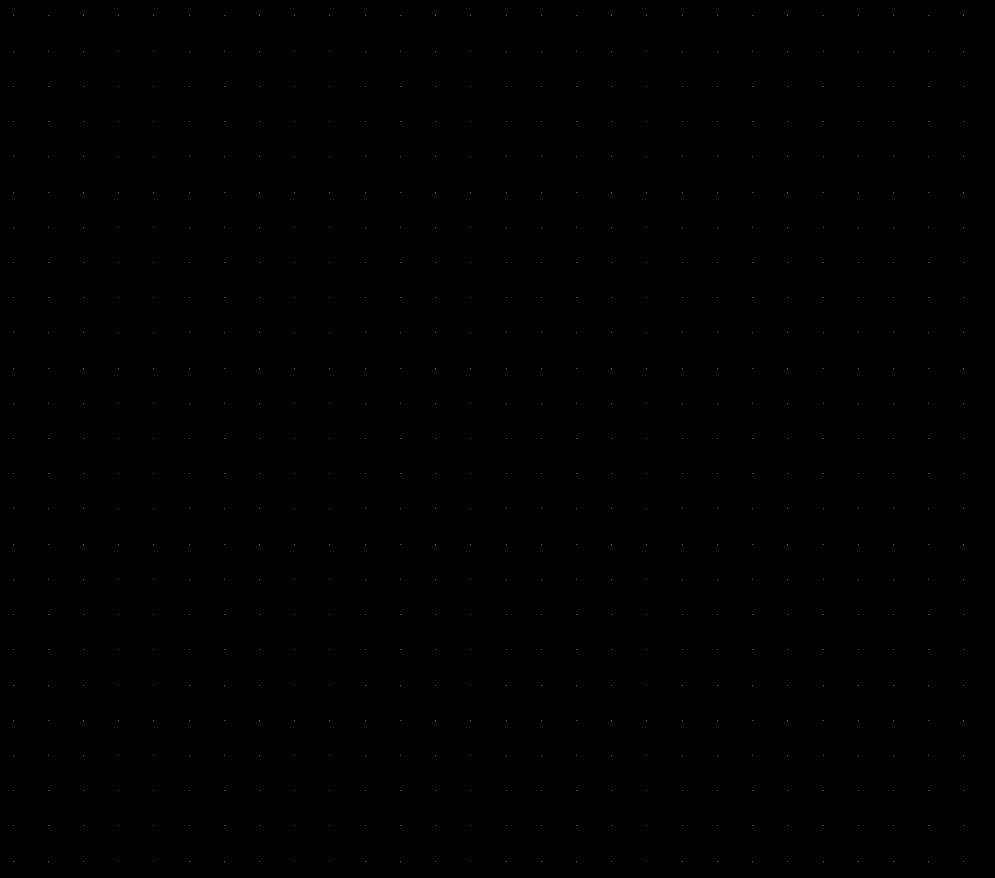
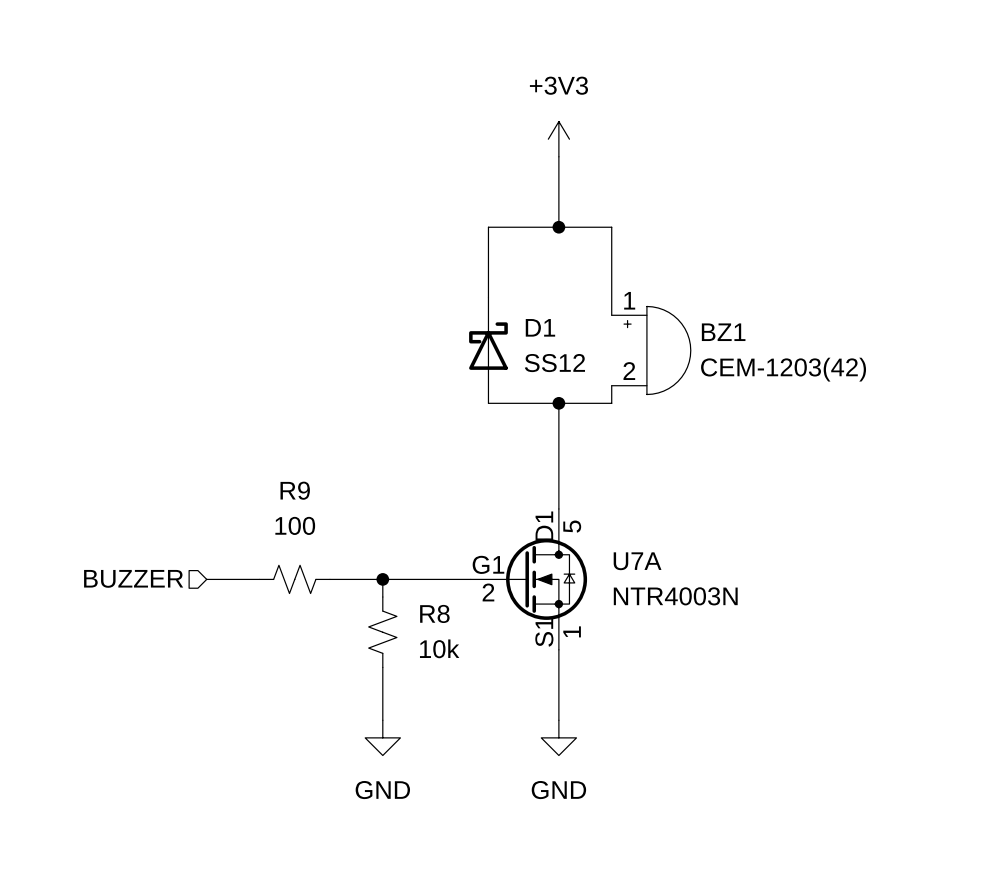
power symbol: none -> +3V3 (558, 139)
wire: none -> (558, 156) (558, 227)
junction: none -> (558, 227)
wire: none -> (488, 297) (488, 227) (611, 227) (611, 315)
D1: none -> SS12 (488, 350)
BZ1: none -> CEM-1203(42) (651, 350)
wire: none -> (611, 385) (611, 403) (488, 403)
wire: none -> (558, 403) (558, 508)
junction: none -> (558, 403)
hierarchical label: none -> BUZZER (133, 578)
wire: none -> (206, 579) (259, 579)
R9: none -> 100 (294, 579)
wire: none -> (329, 579) (470, 579)
wire: none -> (382, 579) (382, 597)
junction: none -> (382, 579)
U7A: none -> NTR4003N (528, 579)
R8: none -> 10k (382, 632)
wire: none -> (558, 649) (558, 720)
wire: none -> (382, 667) (382, 720)
power symbol: none -> GND (382, 737)
power symbol: none -> GND (558, 737)

